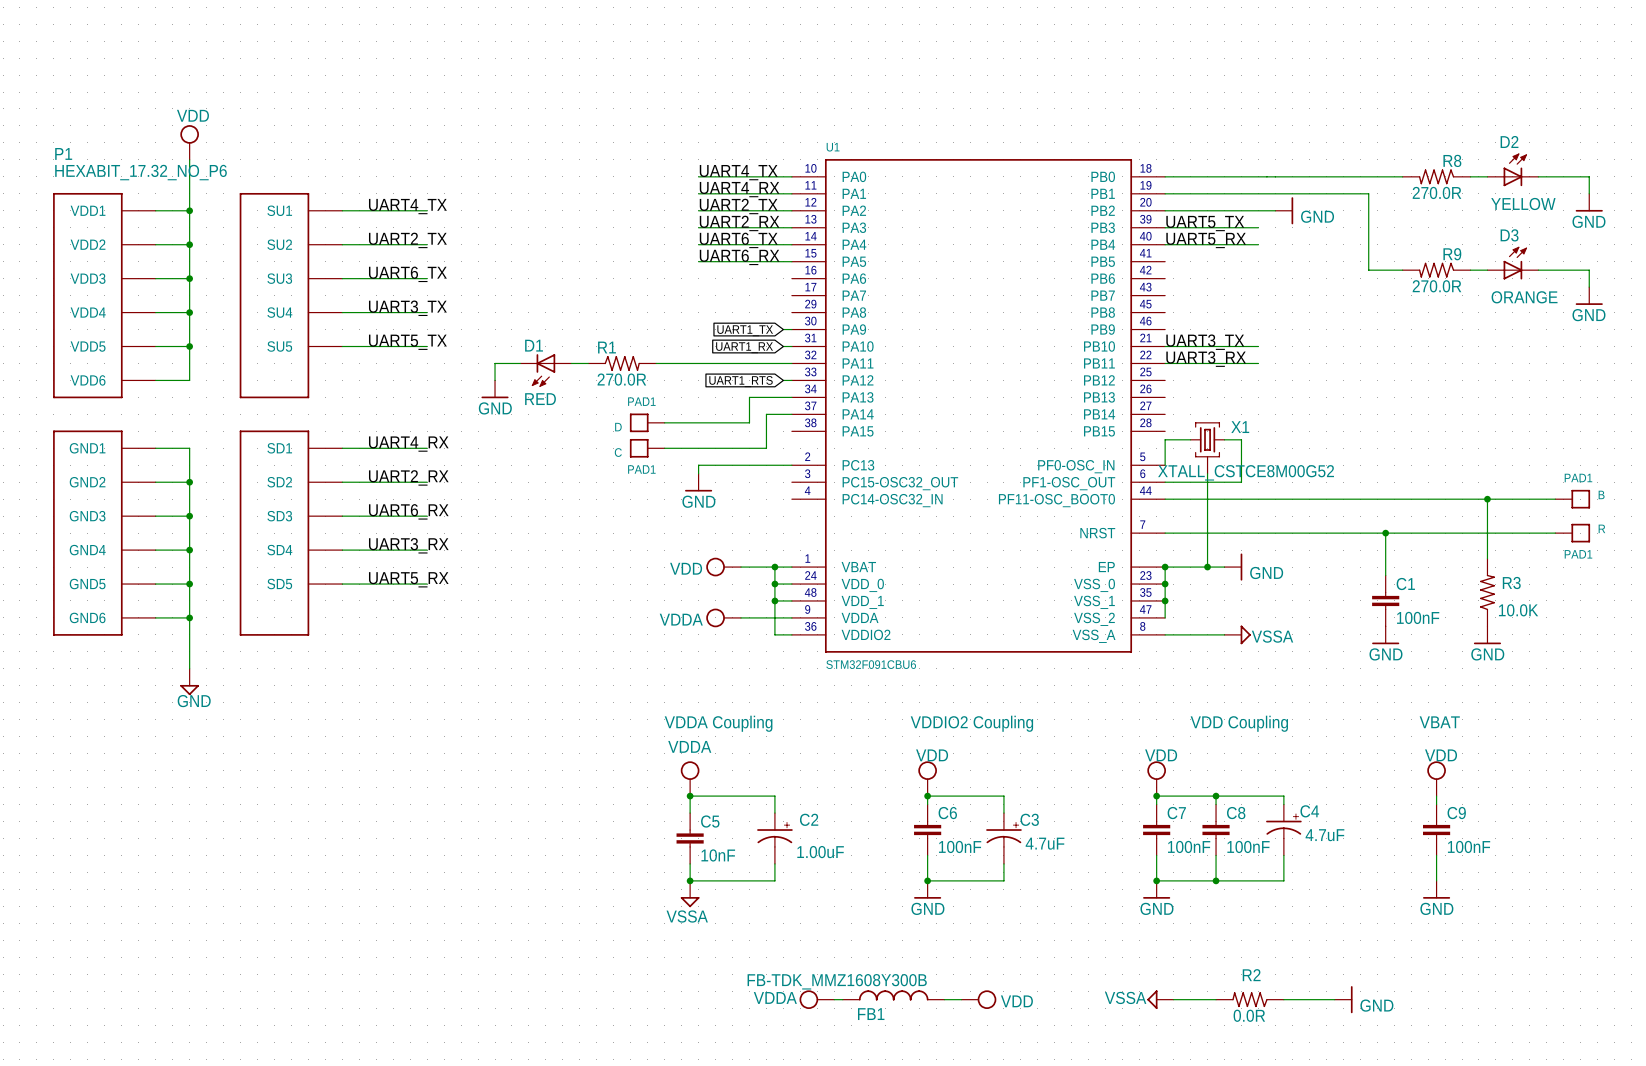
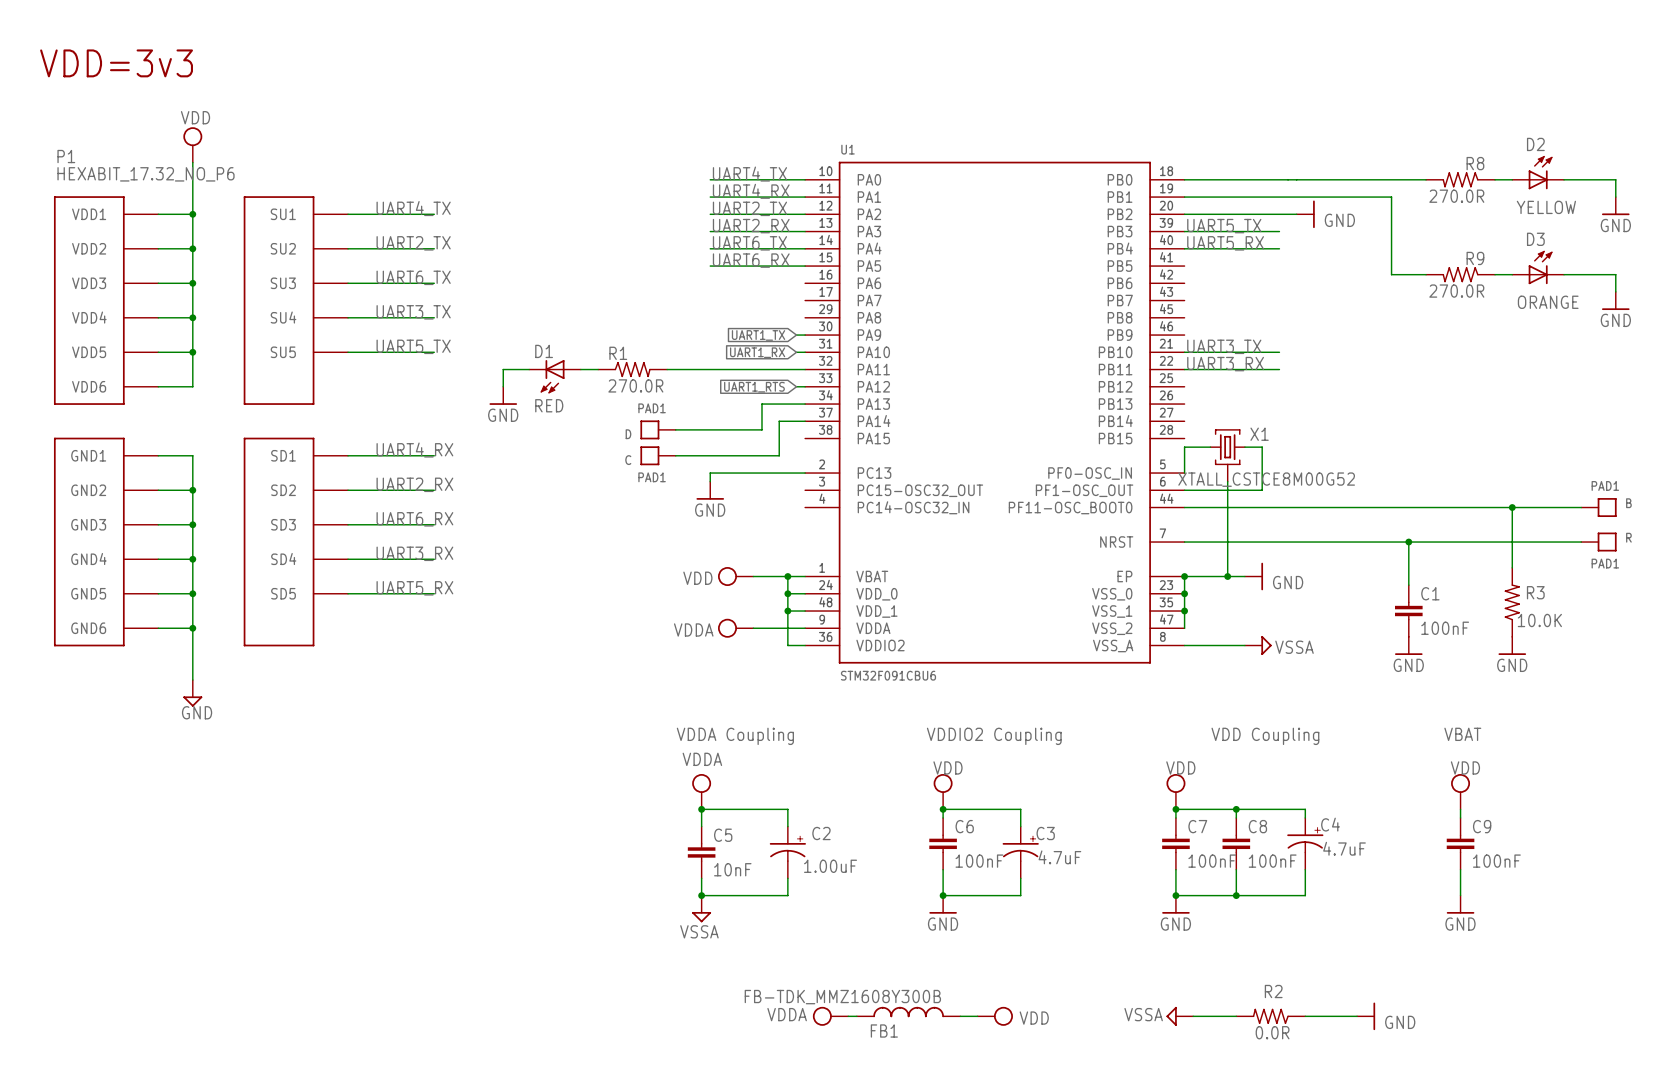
text: none -> VDD=3v3 (116, 63)

